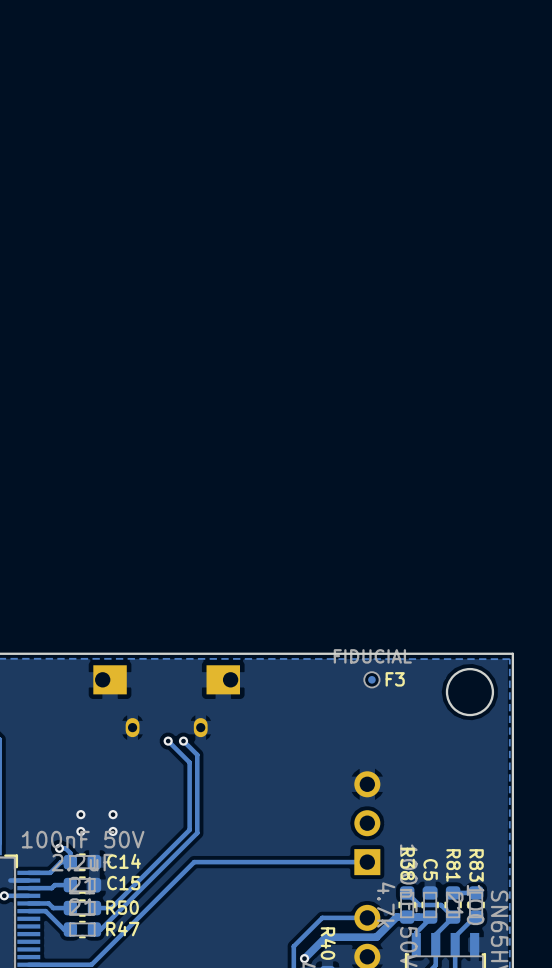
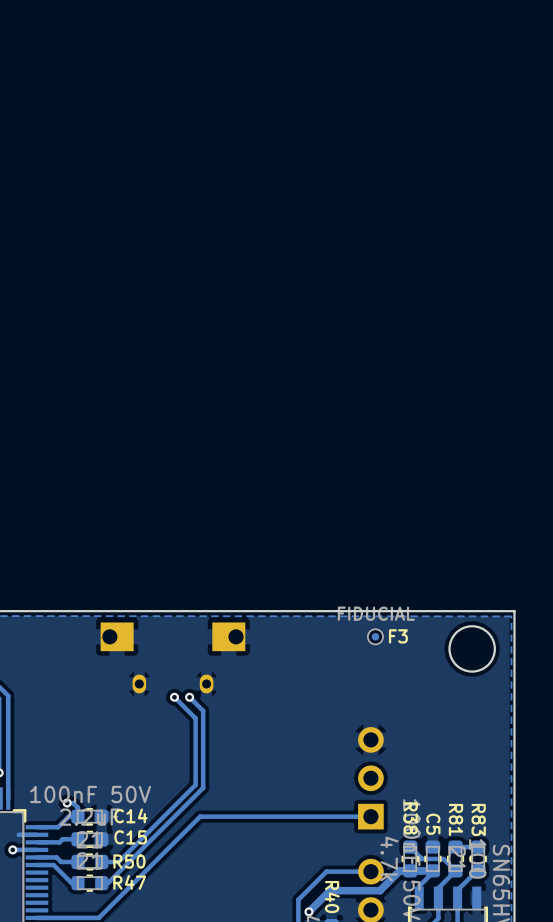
via: (80, 814) -> none
via: (113, 814) -> none
via: (80, 831) -> none
via: (113, 831) -> none

